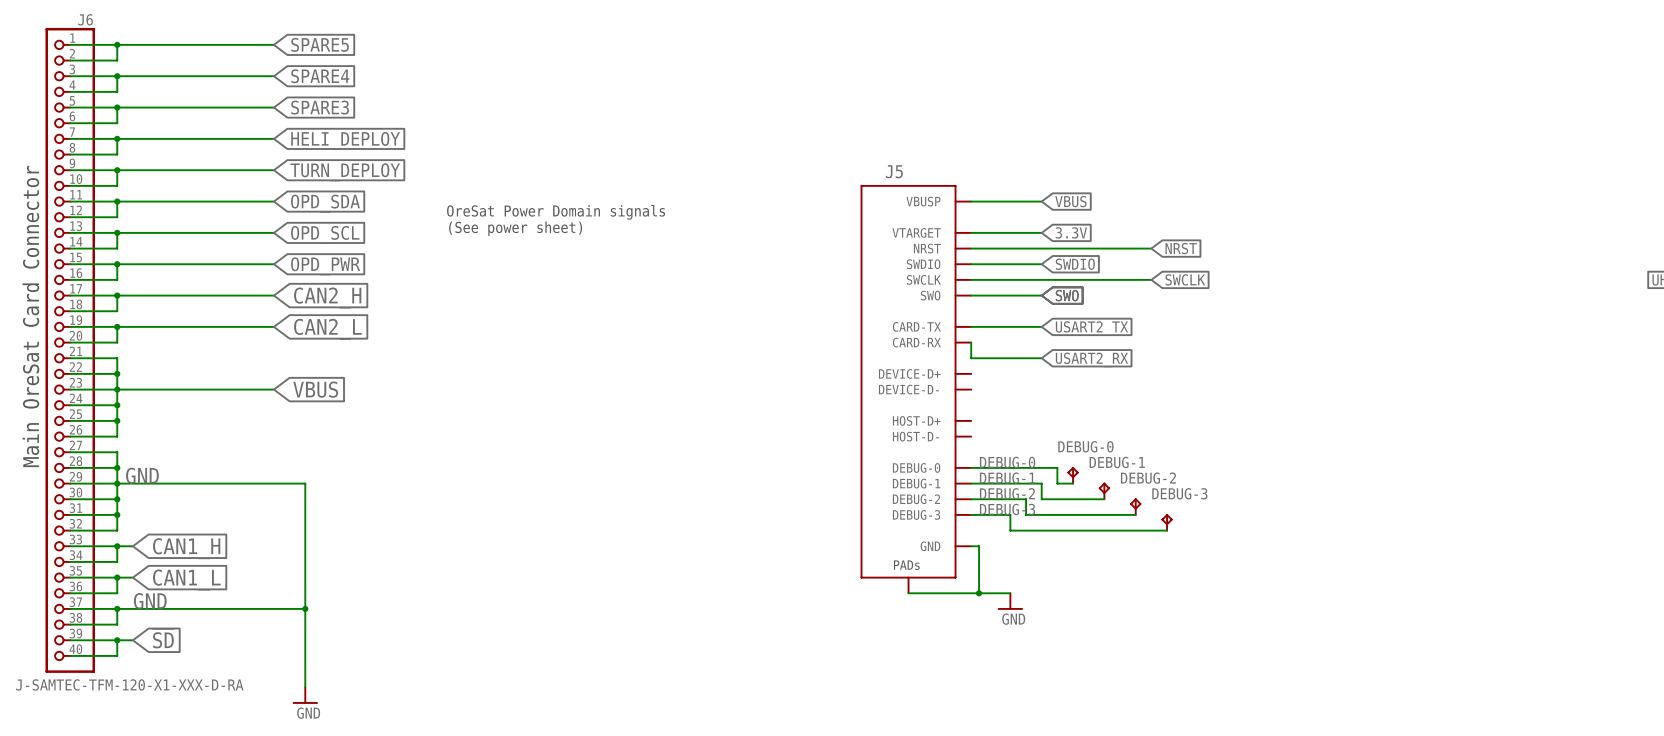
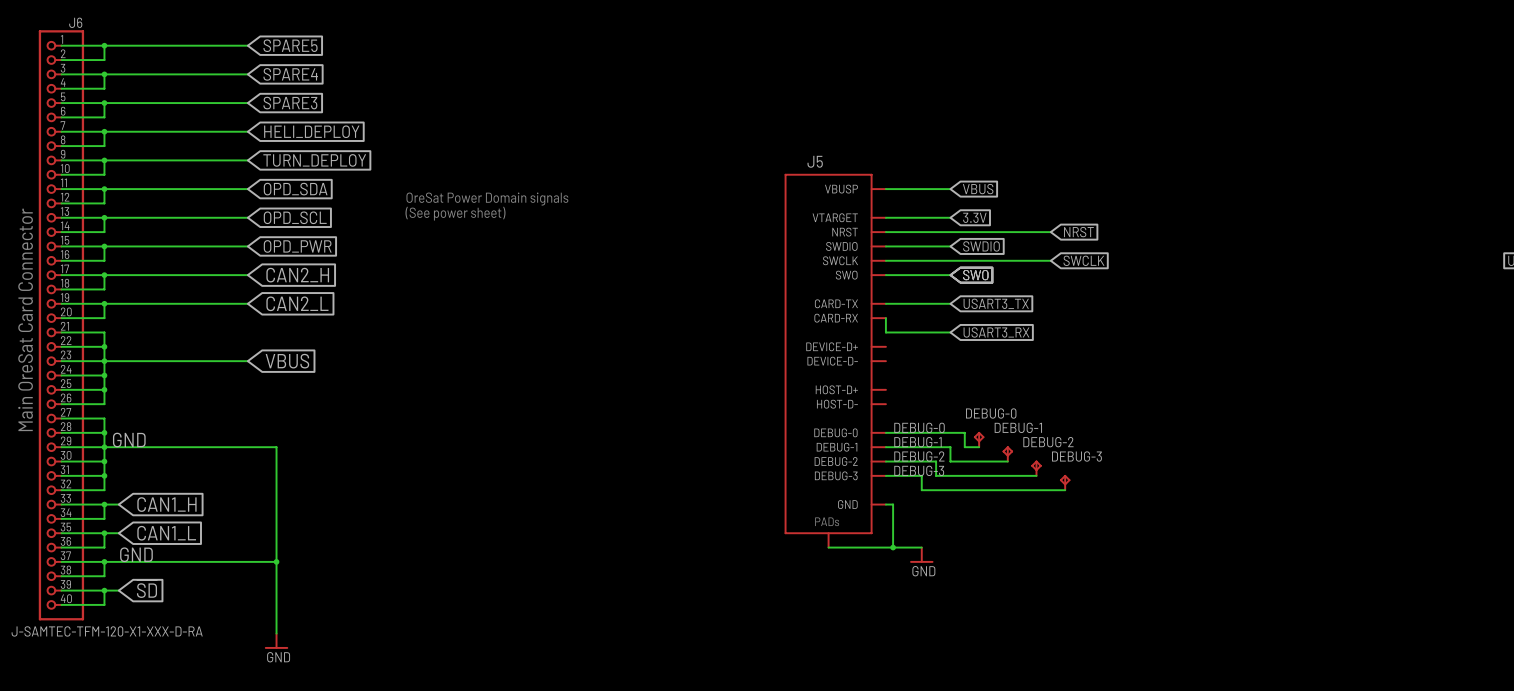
global label: USART2_TX (1091, 328) -> USART3_TX (996, 303)
global label: USART2_RX (1091, 359) -> USART3_RX (996, 332)

